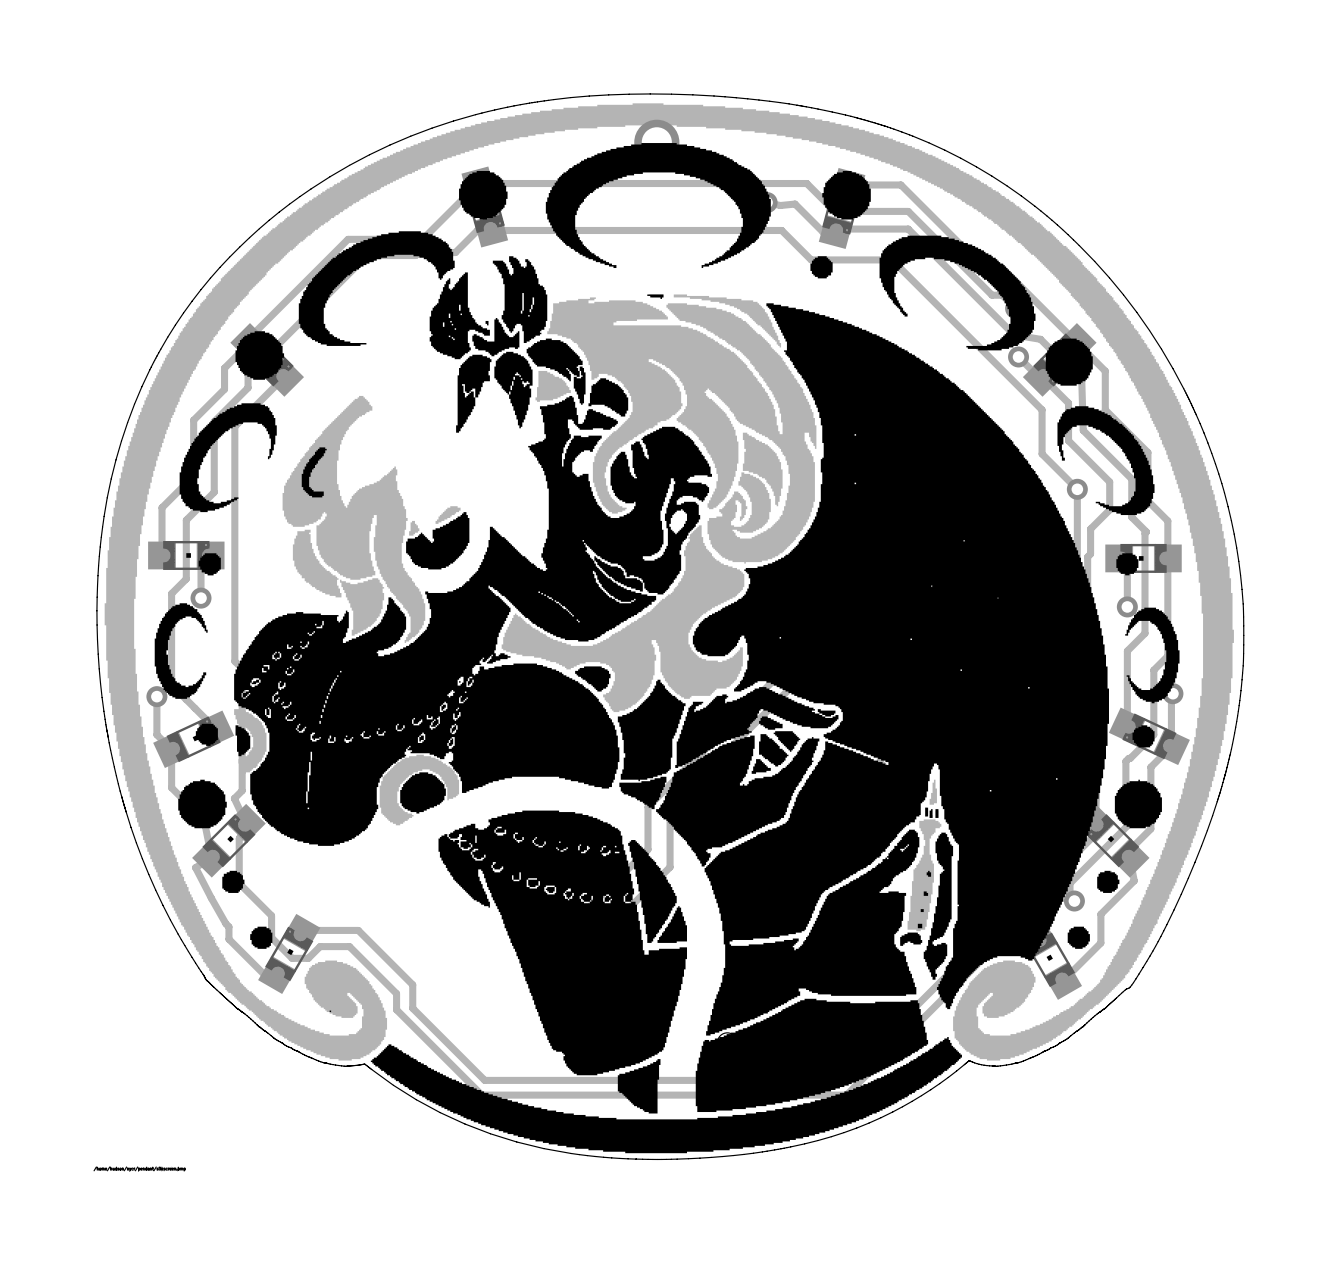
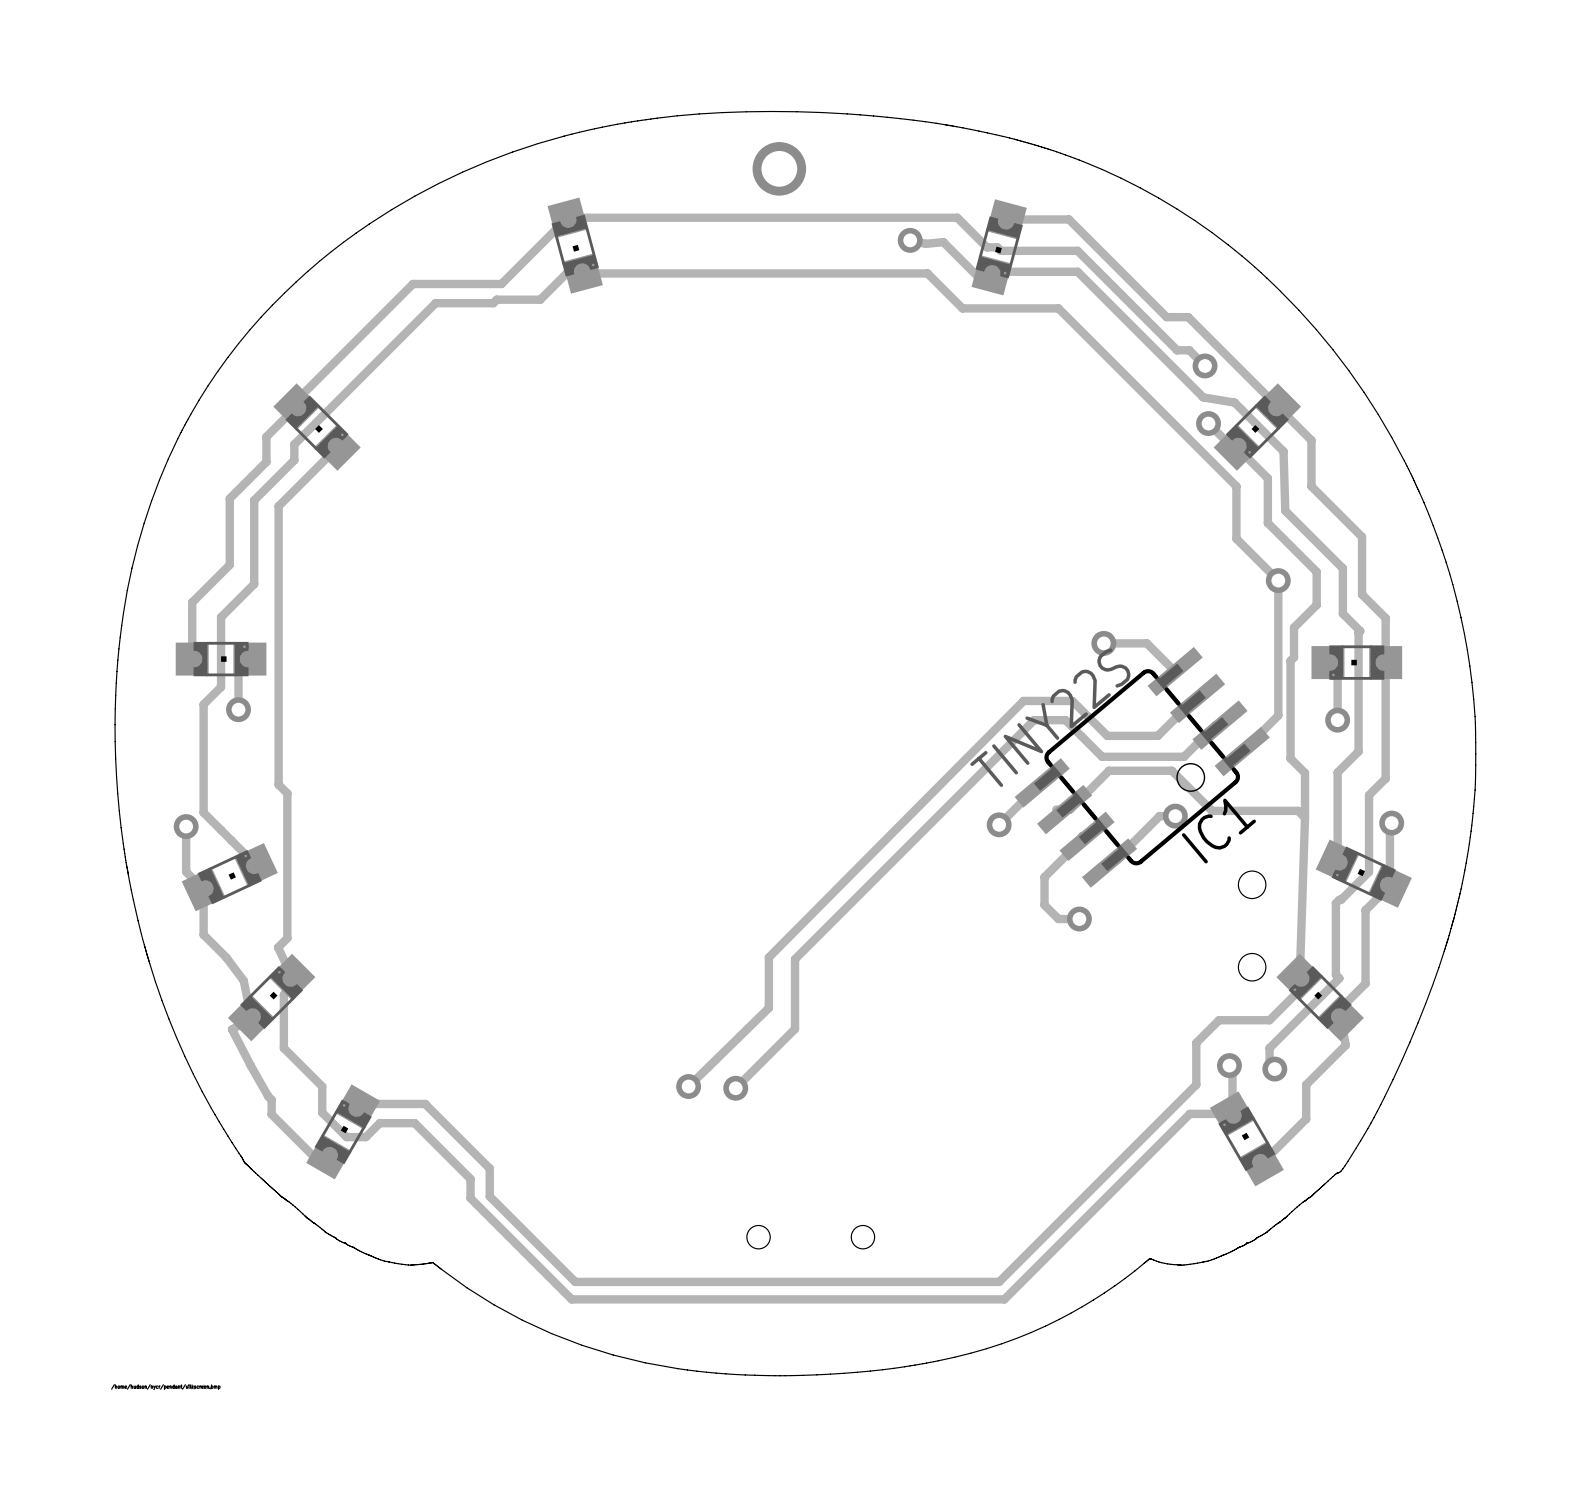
drawing: [104, 103, 1234, 1154] -> none
drawing: [810, 256, 833, 279] -> none
drawing: [198, 553, 221, 576] -> none
drawing: [1116, 553, 1139, 576] -> none
drawing: [222, 870, 245, 893] -> none
drawing: [250, 926, 273, 949] -> none

